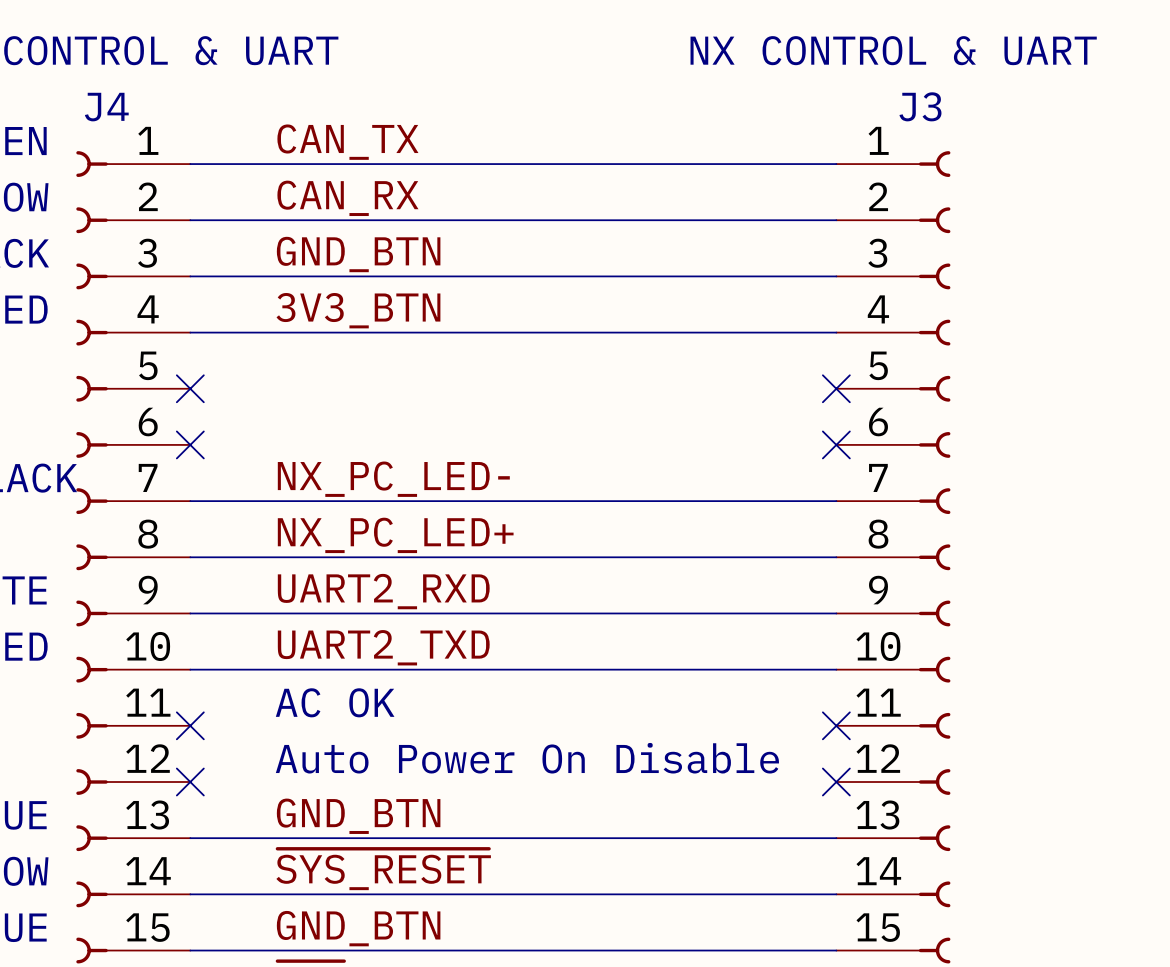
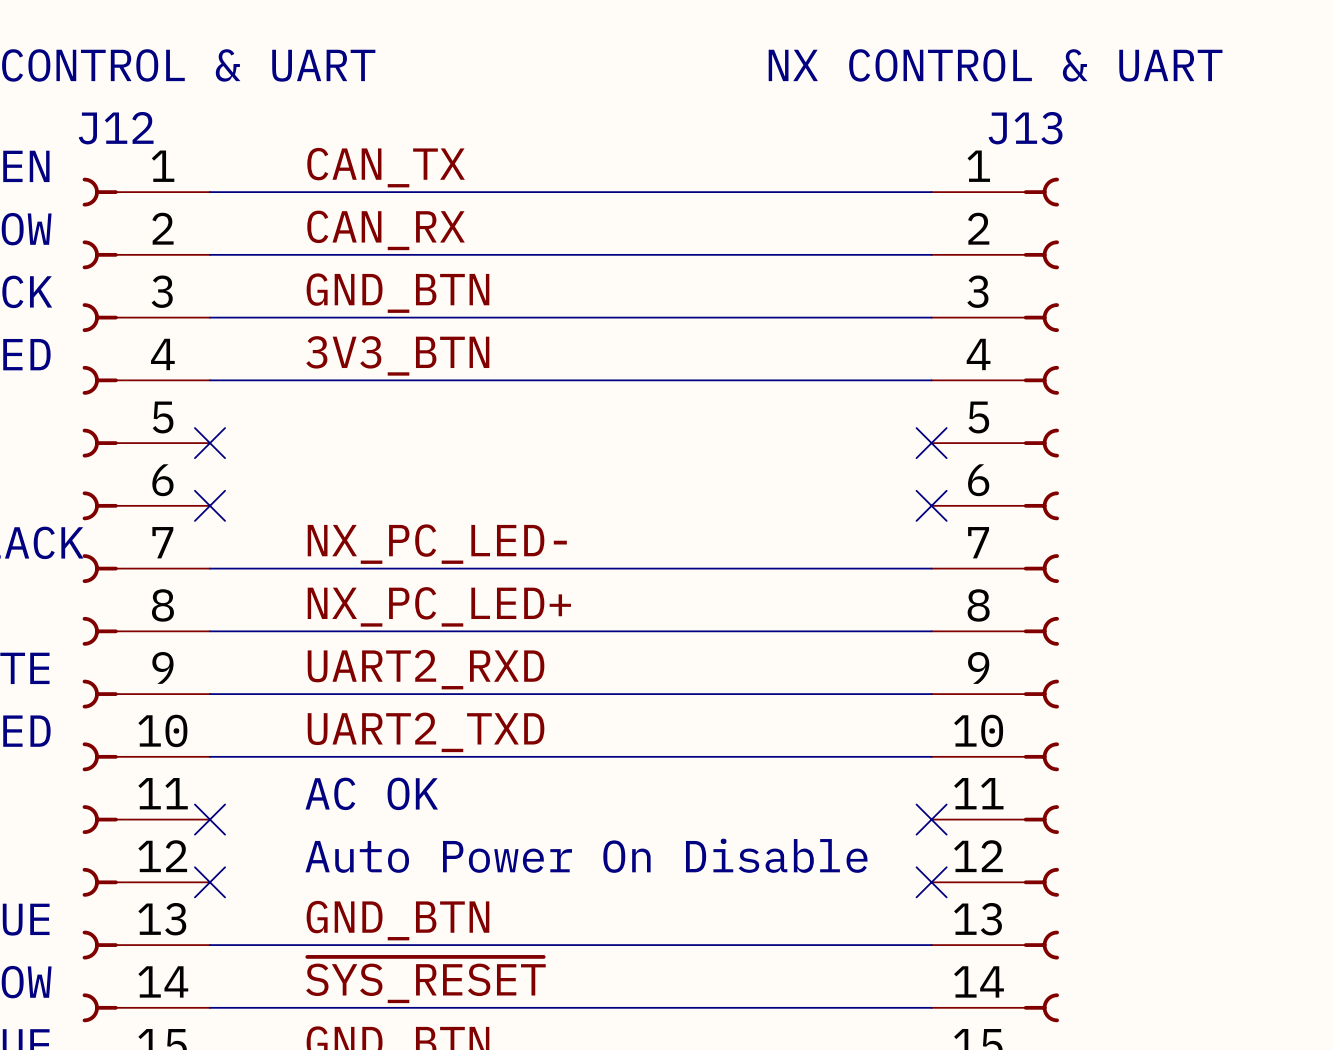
J3 name: J3 (920, 106) -> J13 (1025, 128)
J4 name: J4 (106, 107) -> J12 (116, 128)

